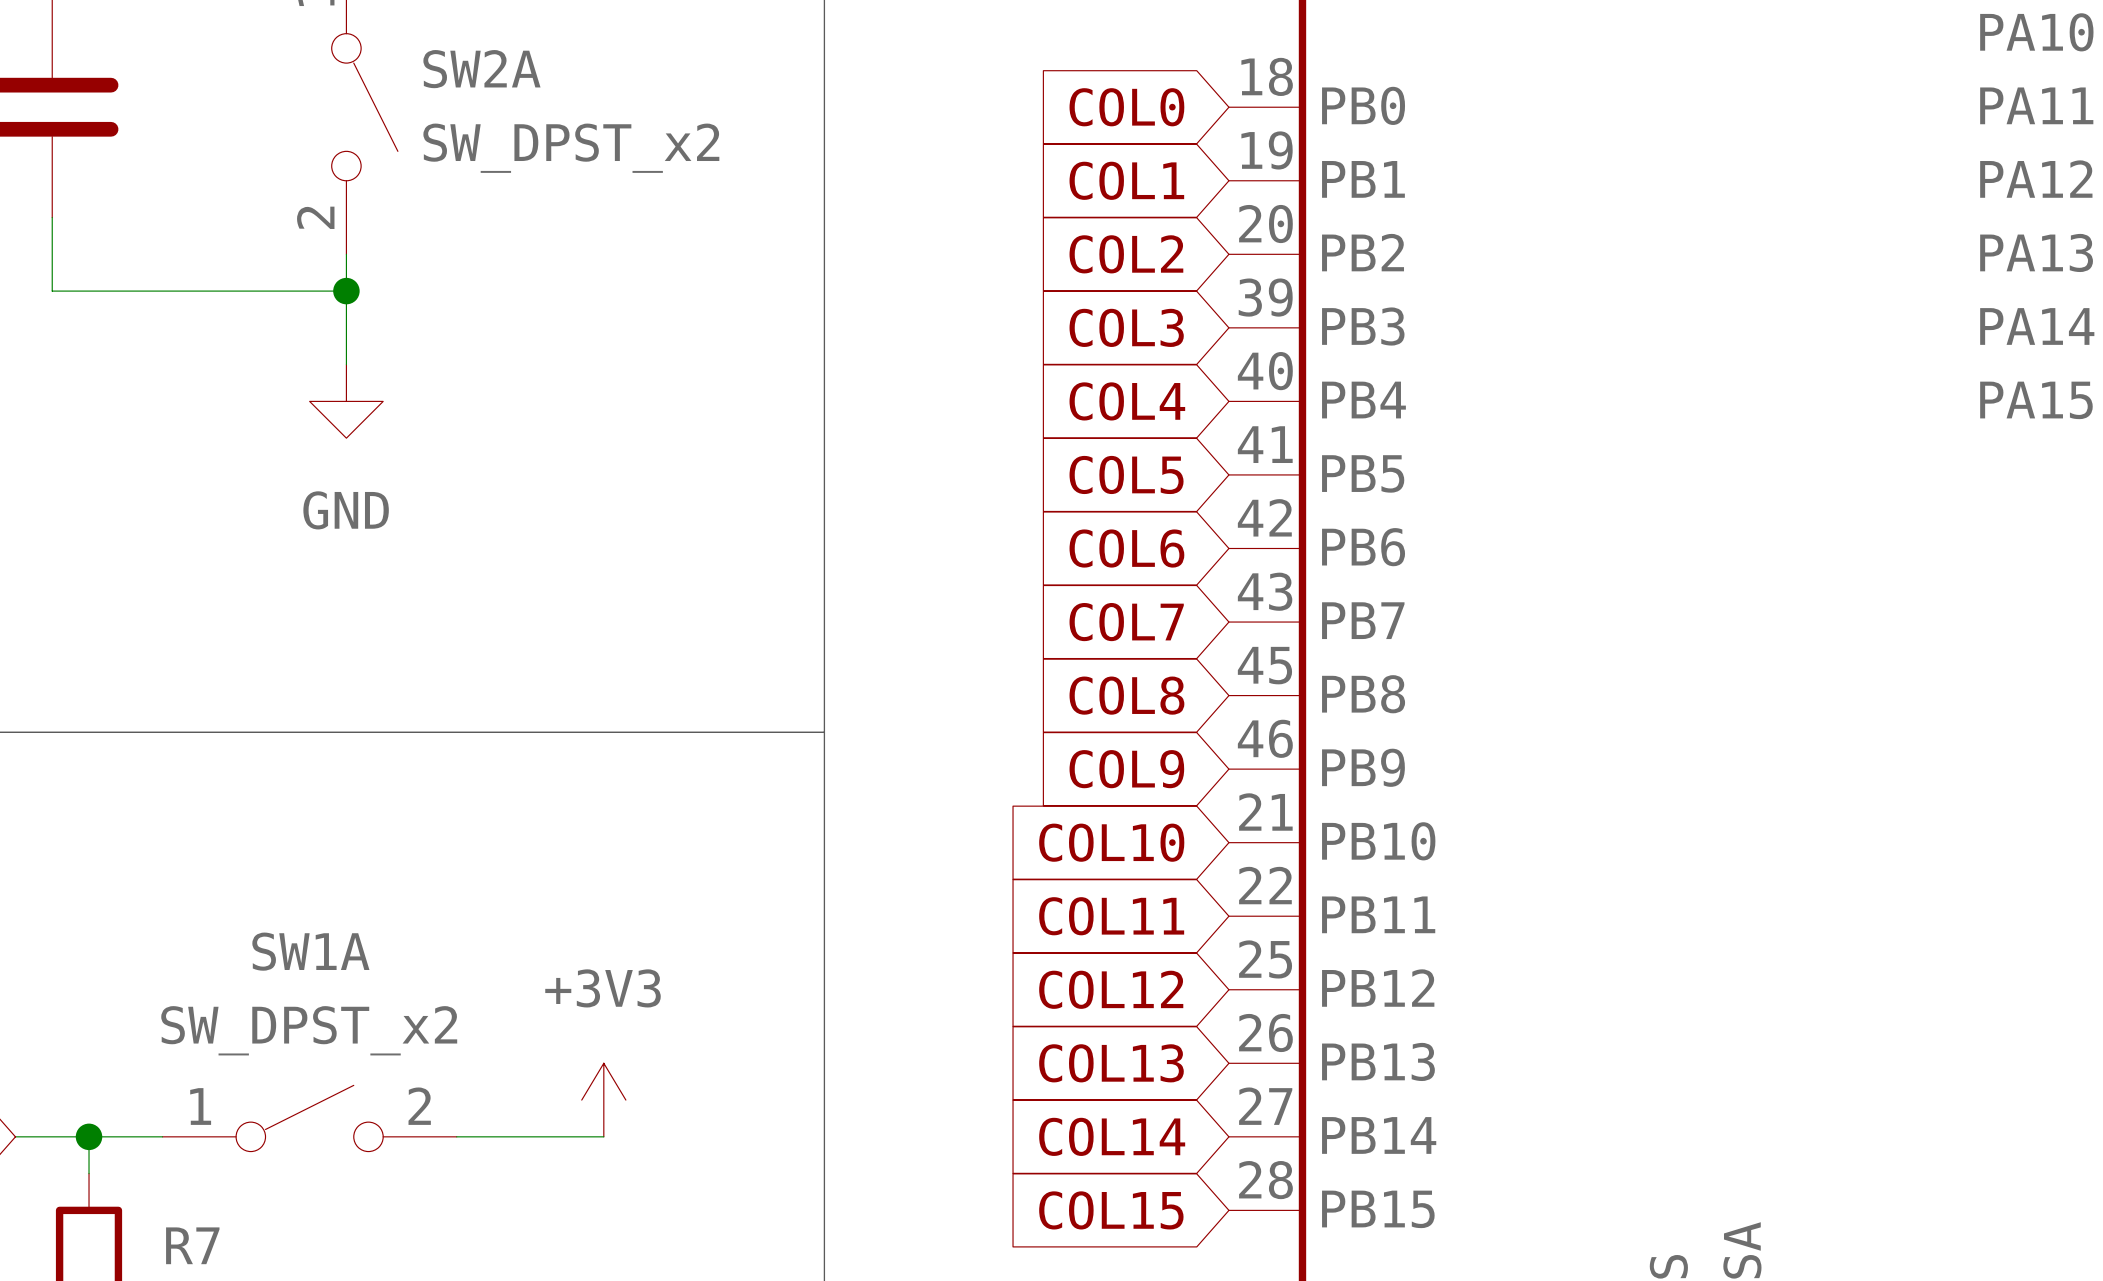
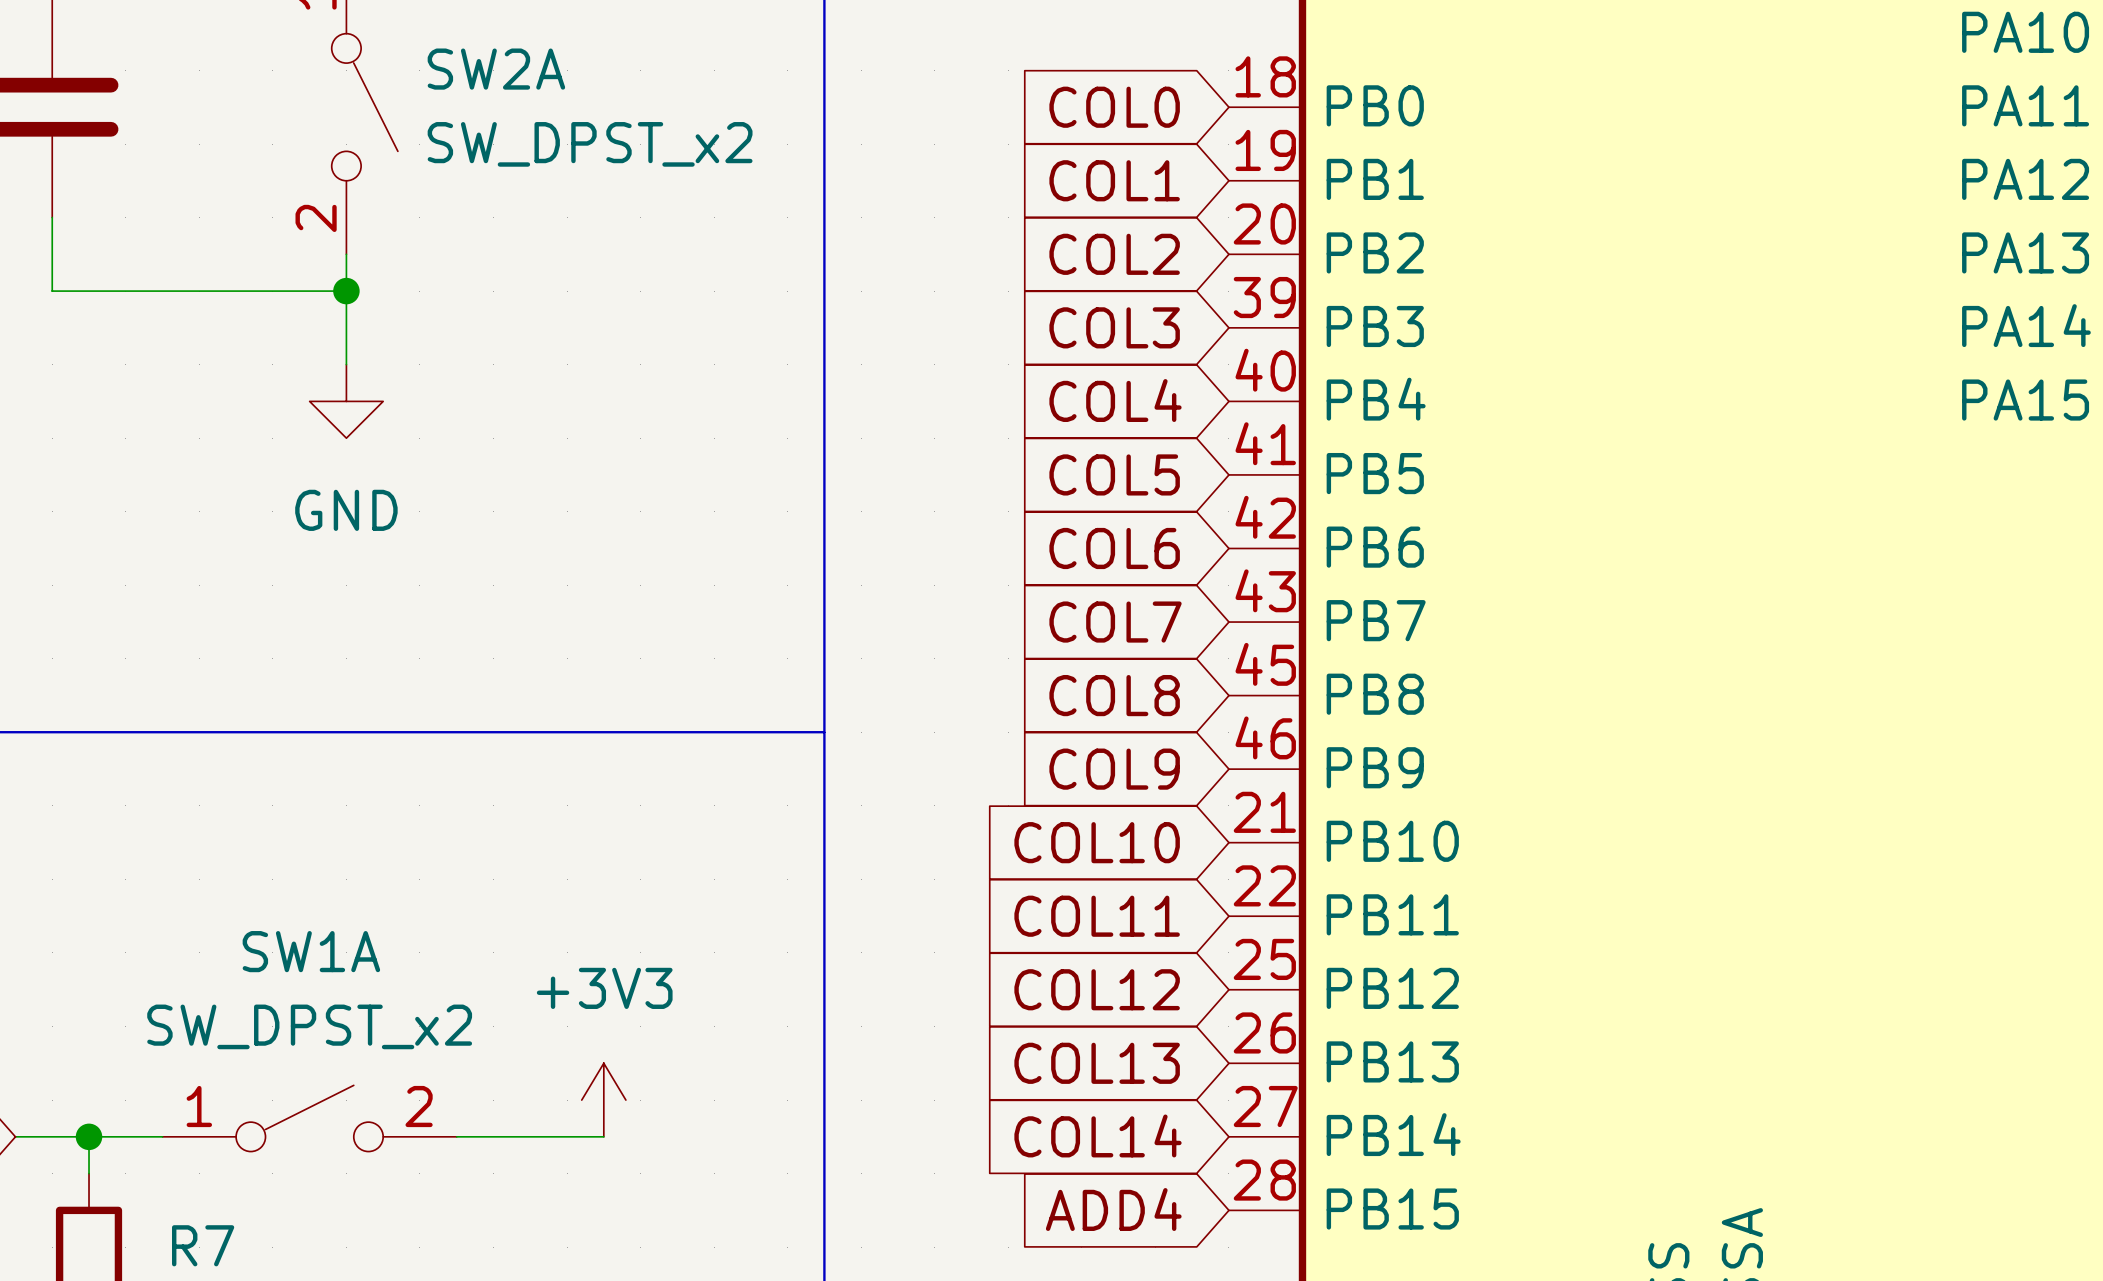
global label: COL15 (1111, 1210) -> ADD4 (1113, 1209)

